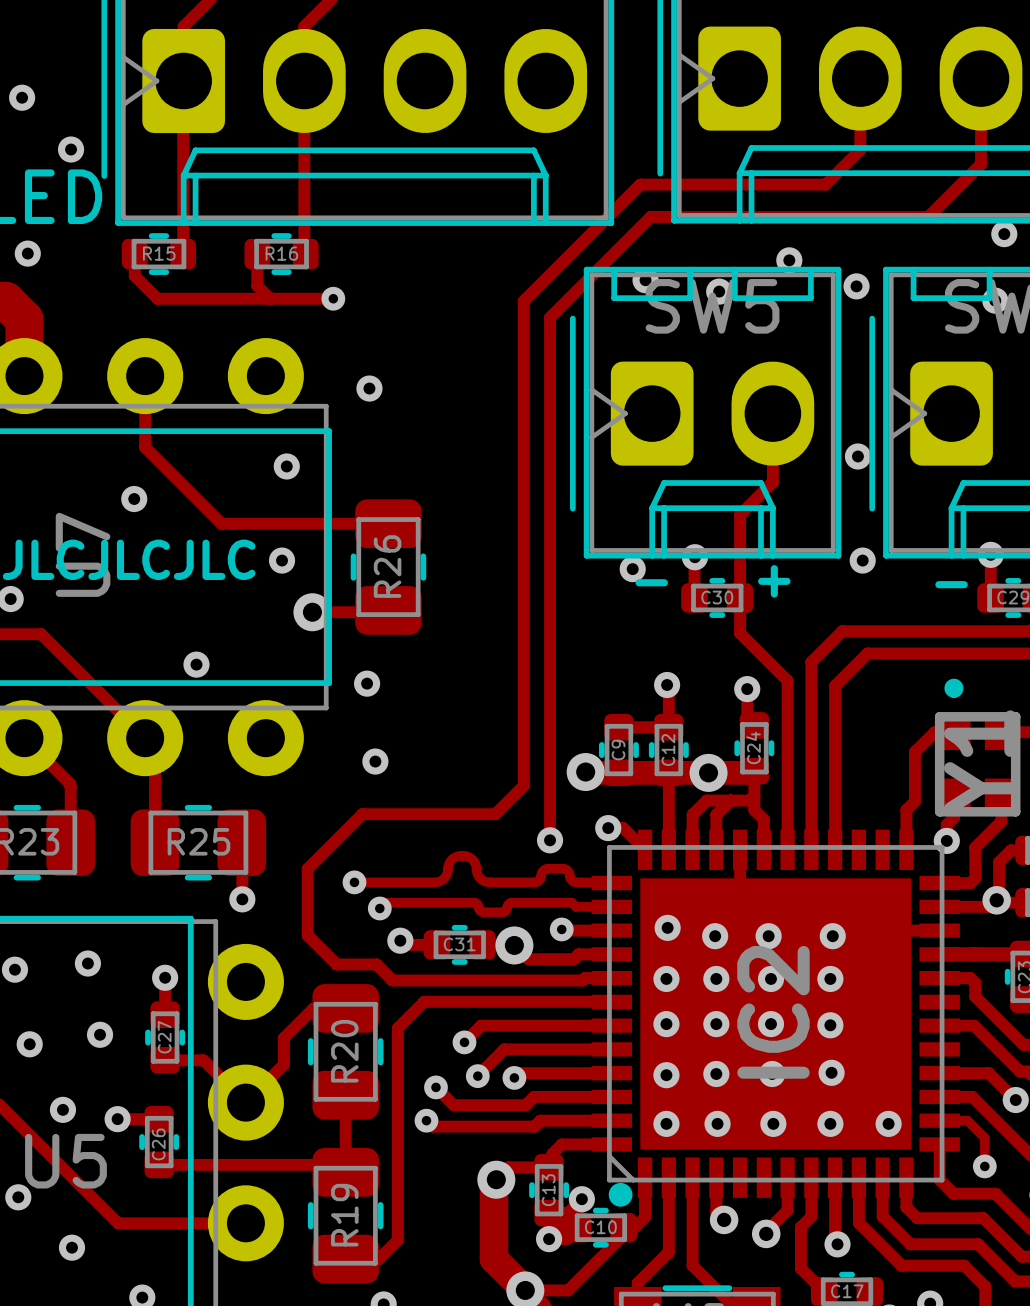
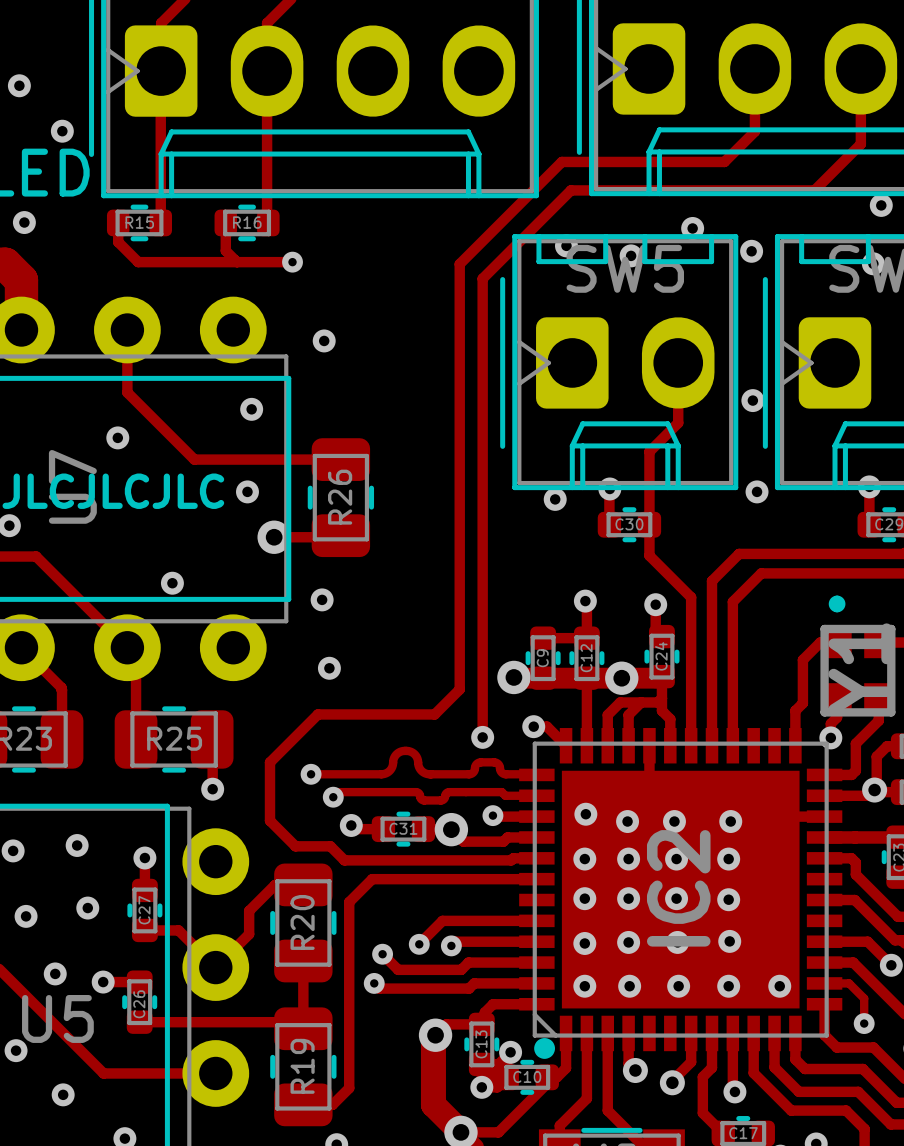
text: + (774, 581) -> none
text: - (651, 582) -> none
text: - (951, 584) -> none
track: (611, 1025) (481, 1025) (464, 1042) -> none
via: (464, 1042) -> none

